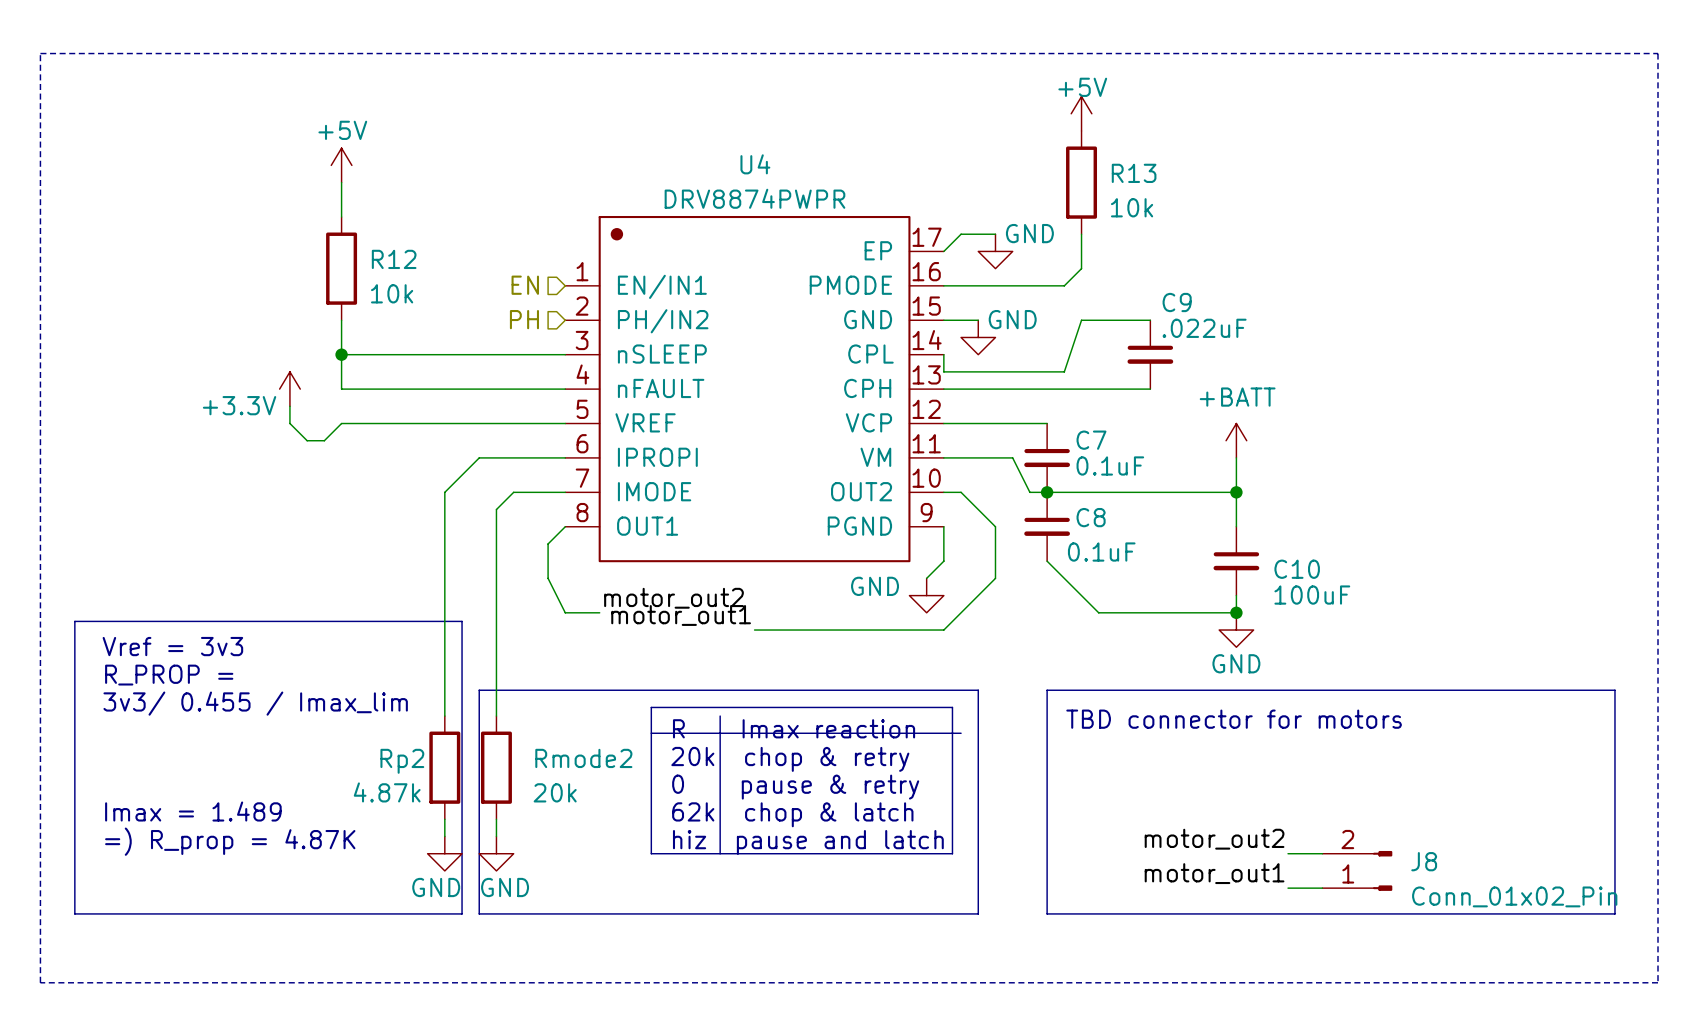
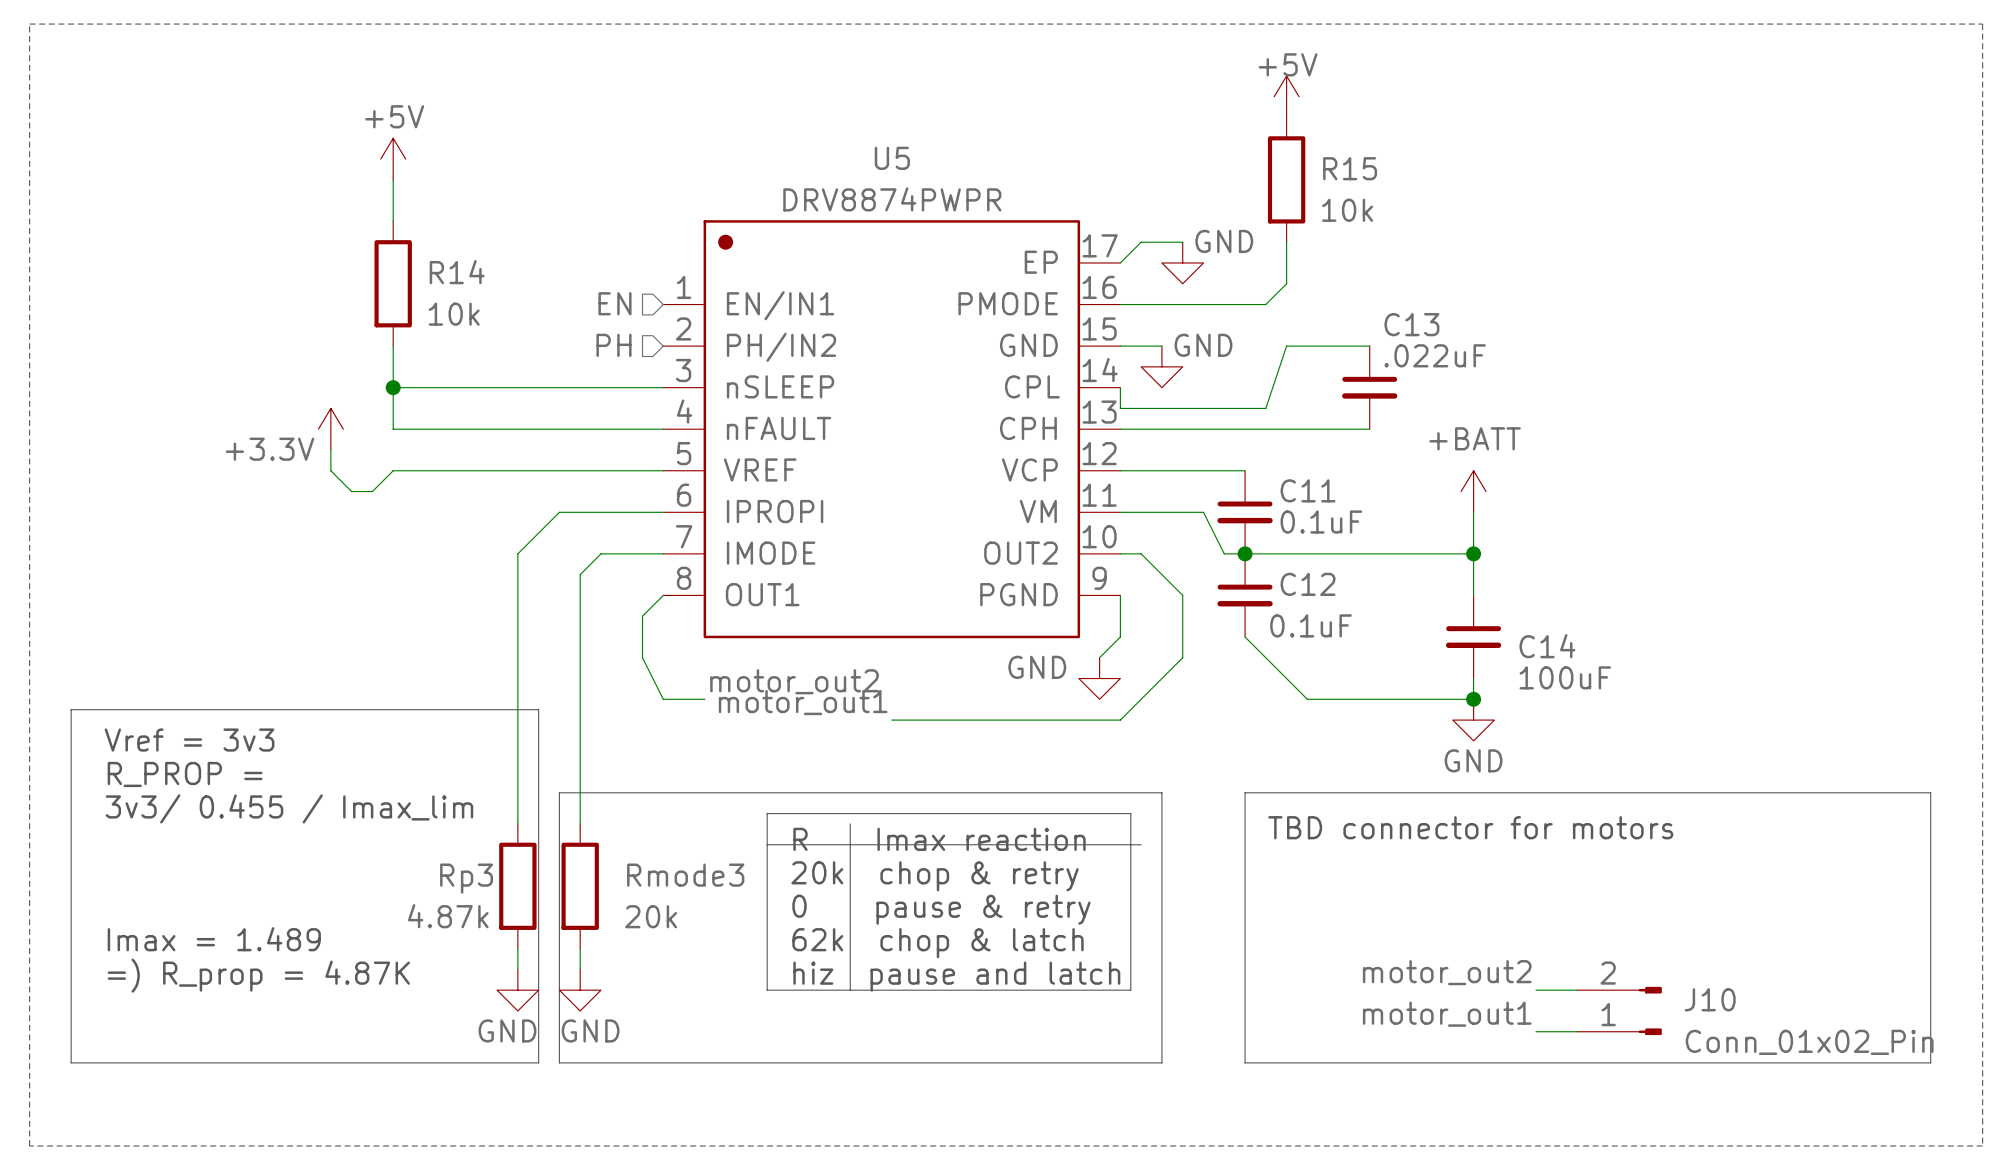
U4 name: U4 (755, 164) -> U5 (892, 158)
R13 name: R13 (1134, 173) -> R15 (1350, 168)
R12 name: R12 (394, 259) -> R14 (457, 272)
C9 name: C9 (1177, 302) -> C13 (1411, 324)
C7 name: C7 (1091, 440) -> C11 (1308, 490)
C8 name: C8 (1091, 517) -> C12 (1308, 584)
C10 name: C10 (1297, 569) -> C14 (1547, 646)
Rmode2 name: Rmode2 (583, 758) -> Rmode3 (685, 875)
Rp2 name: Rp2 (402, 761) -> Rp3 (466, 878)
J8 name: J8 (1424, 861) -> J10 (1710, 999)

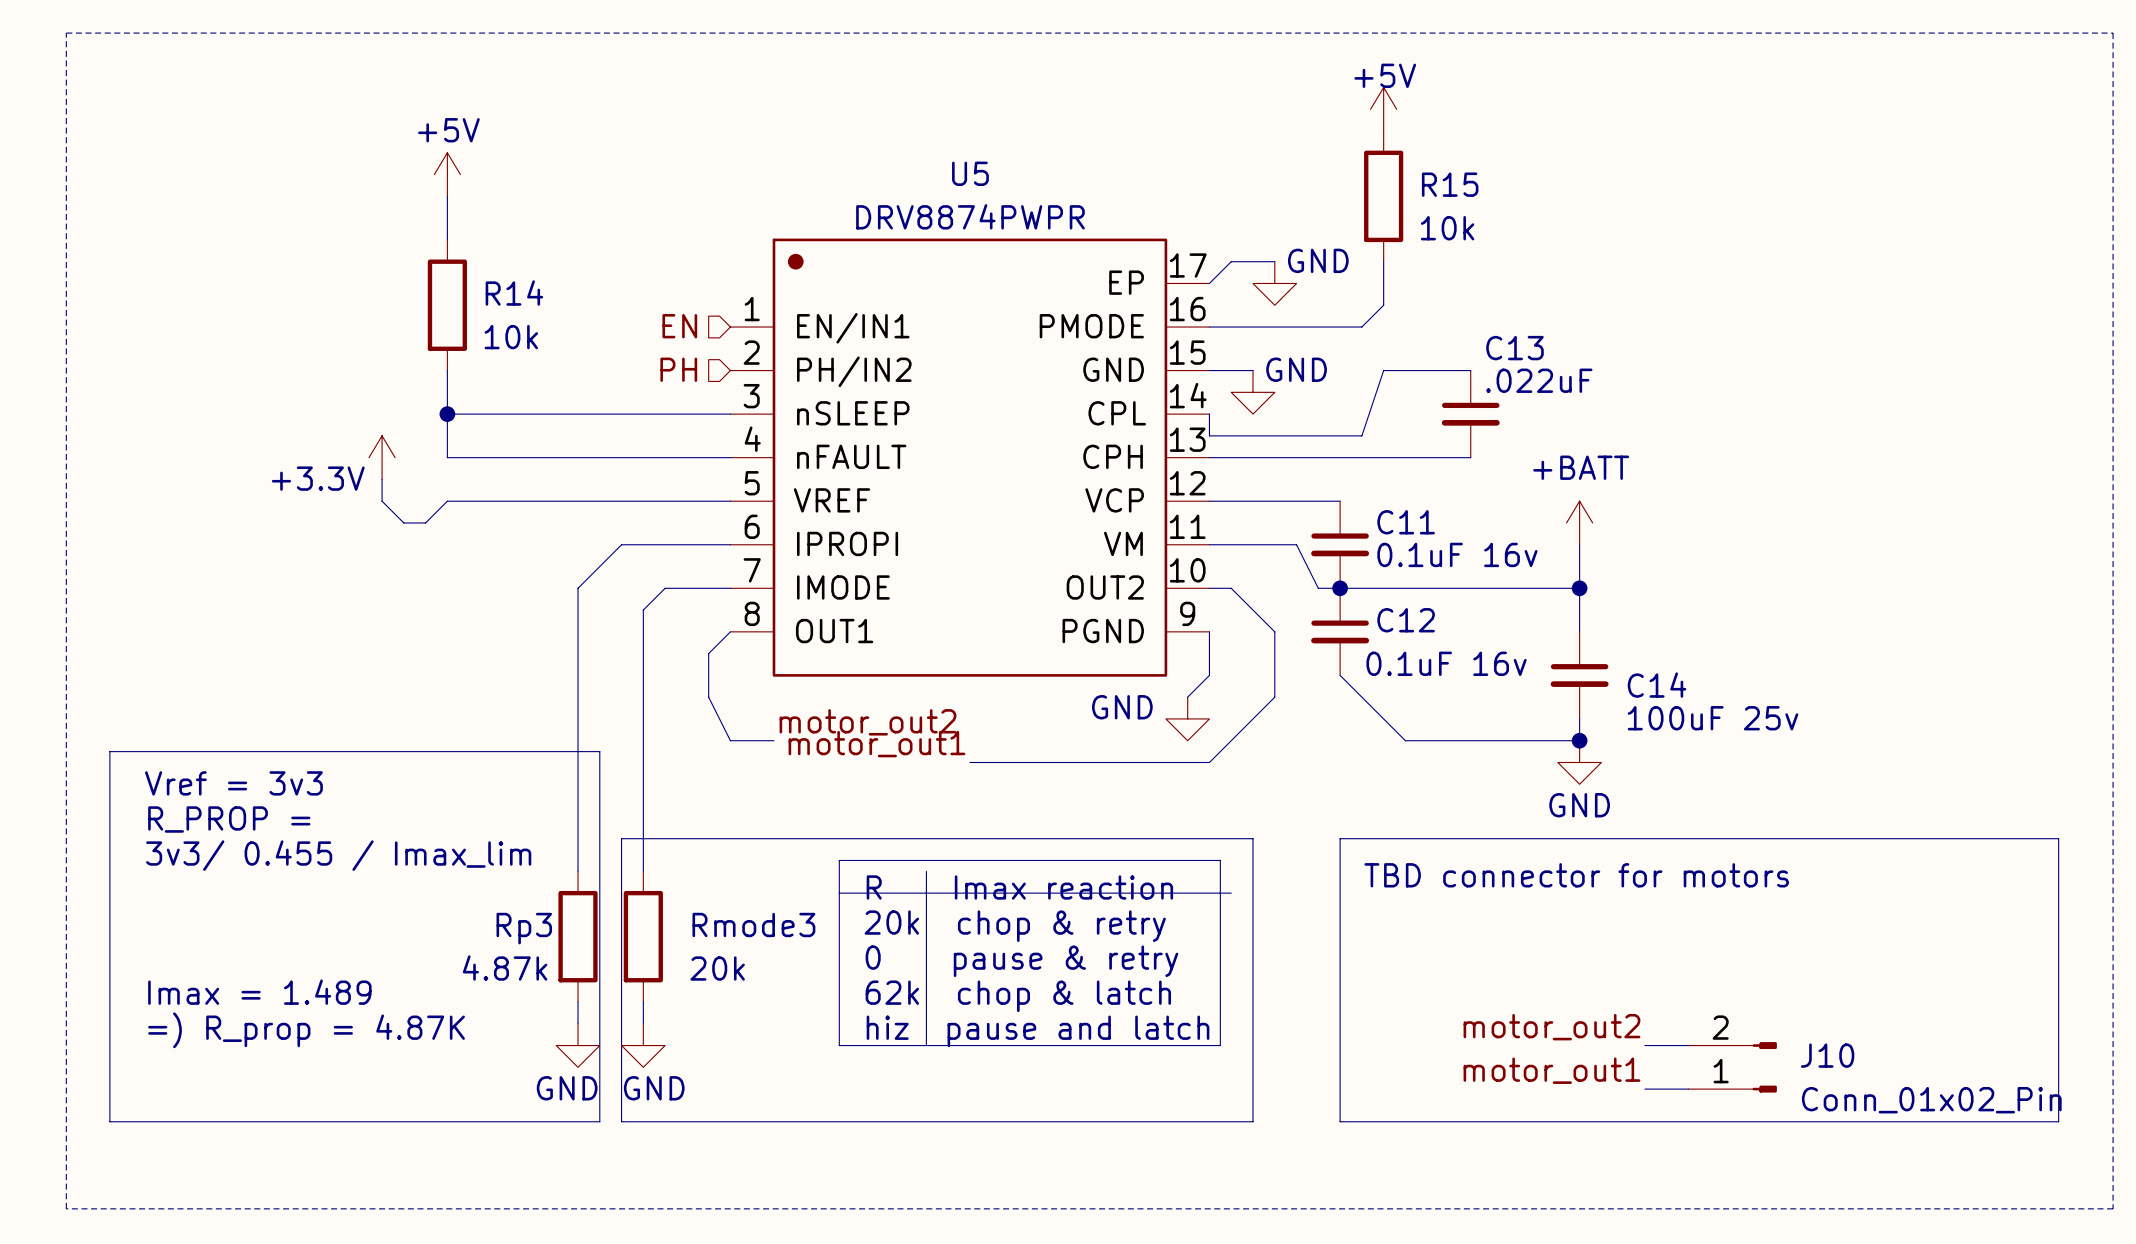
C11 value: 0.1uF (1321, 522) -> 0.1uF 16v (1457, 554)
C12 value: 0.1uF (1311, 625) -> 0.1uF 16v (1446, 663)
C14 value: 100uF (1565, 677) -> 100uF 25v (1713, 718)

